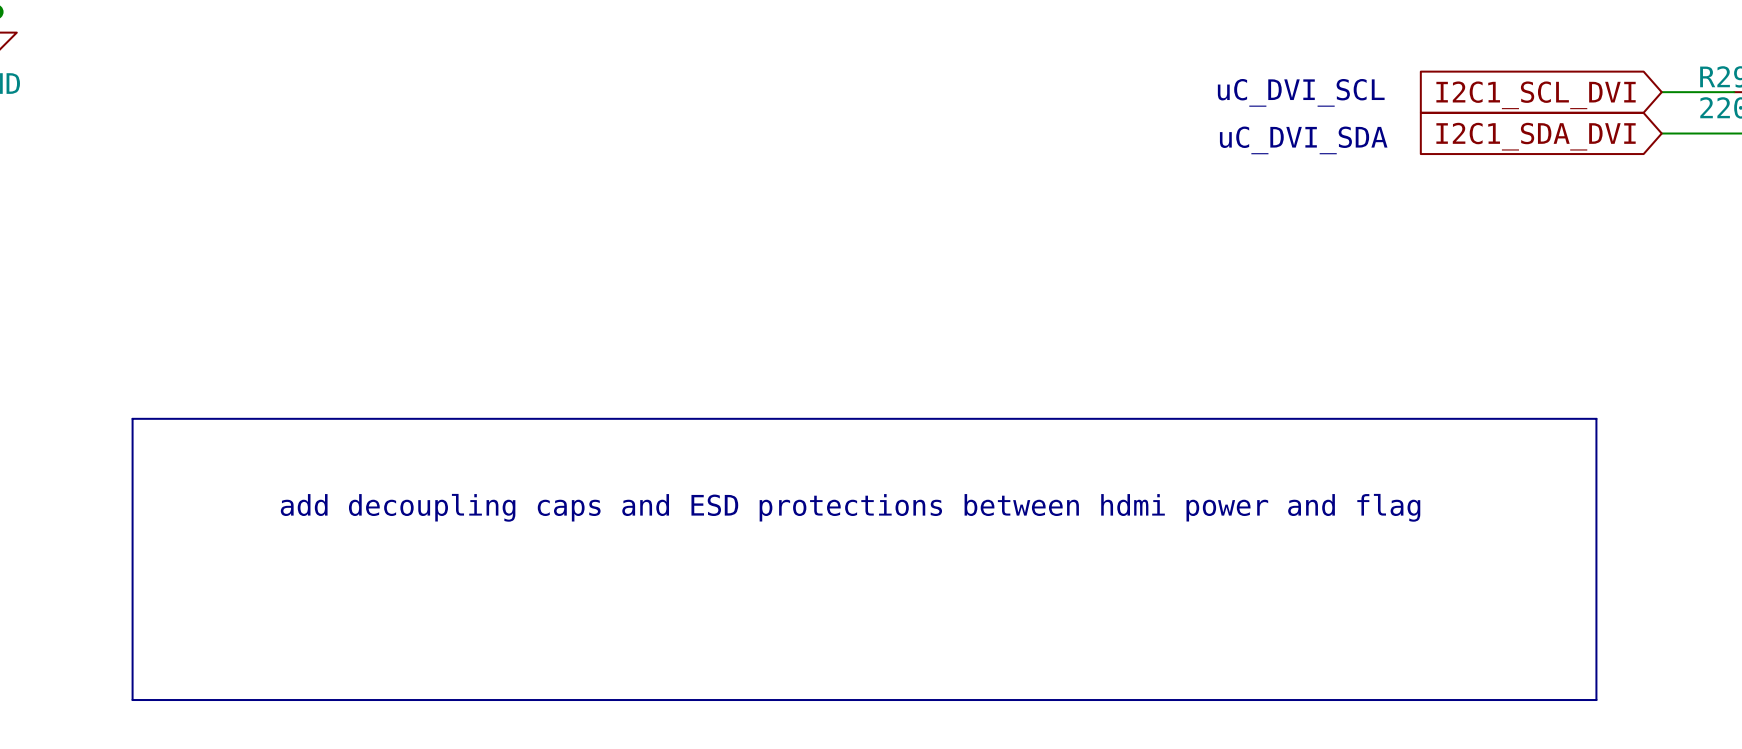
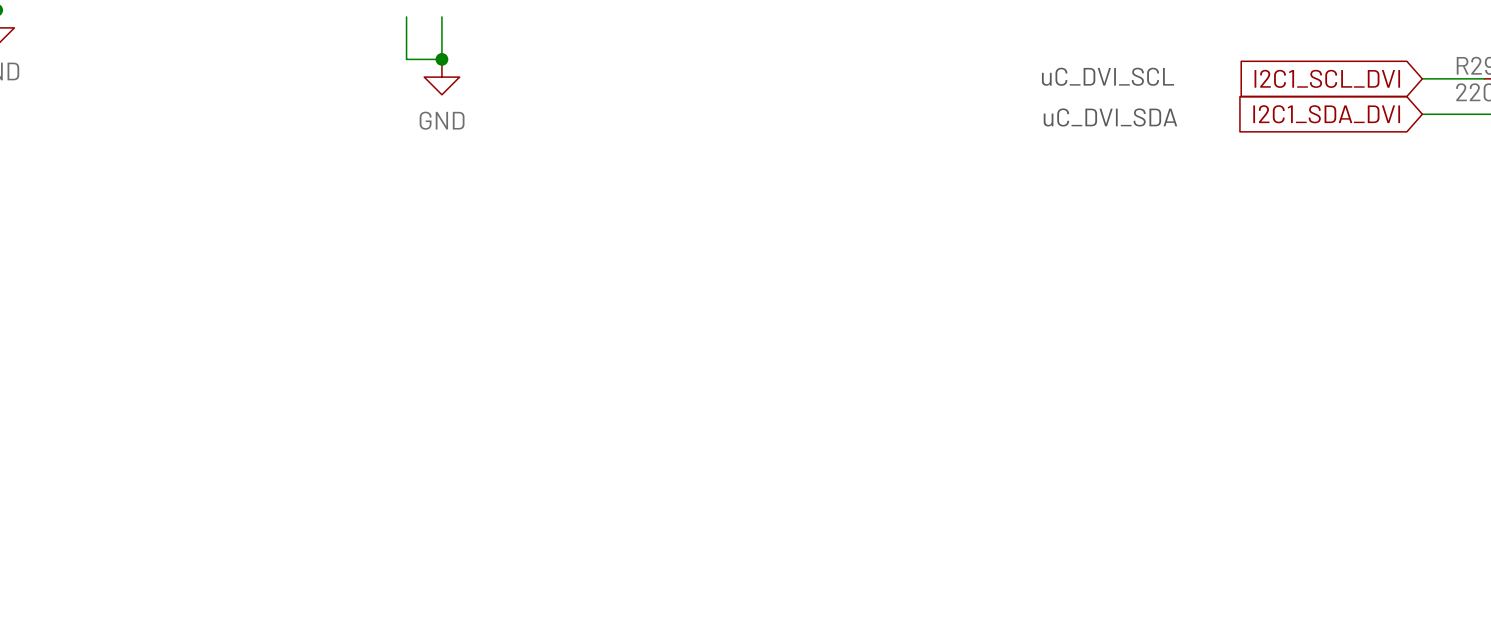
wire: none -> (406, 16) (406, 59) (441, 59) (441, 16)
junction: none -> (441, 59)
power symbol: none -> GND (441, 77)
line: (132, 418) (1596, 418) (1596, 700) (132, 700) (132, 418) -> none
text: add decoupling caps and ESD protections between hdmi power and flag (850, 507) -> none

